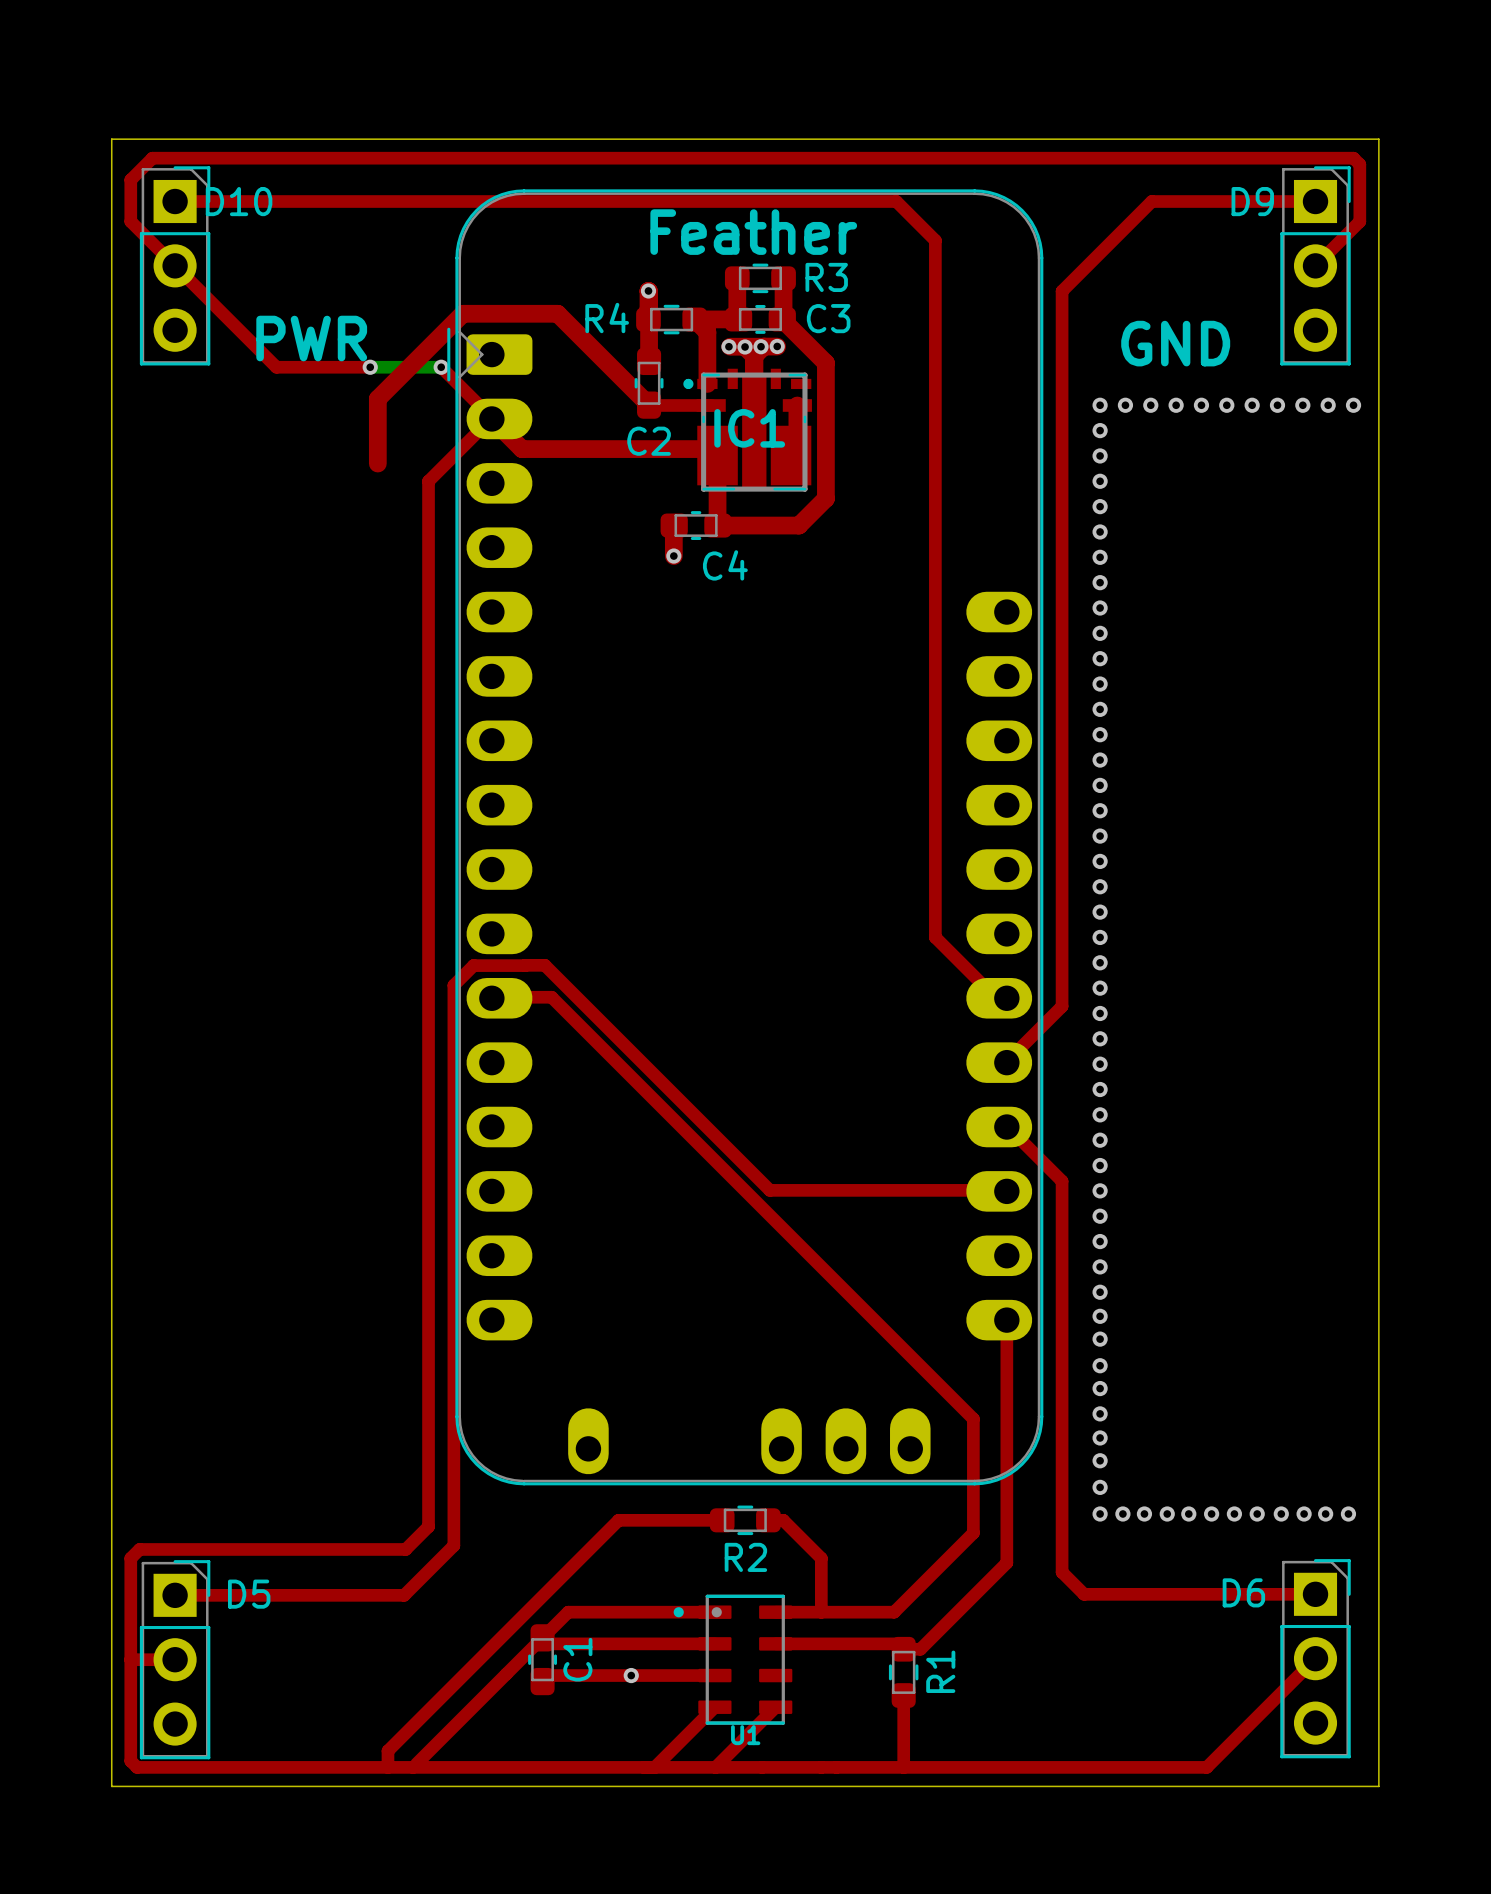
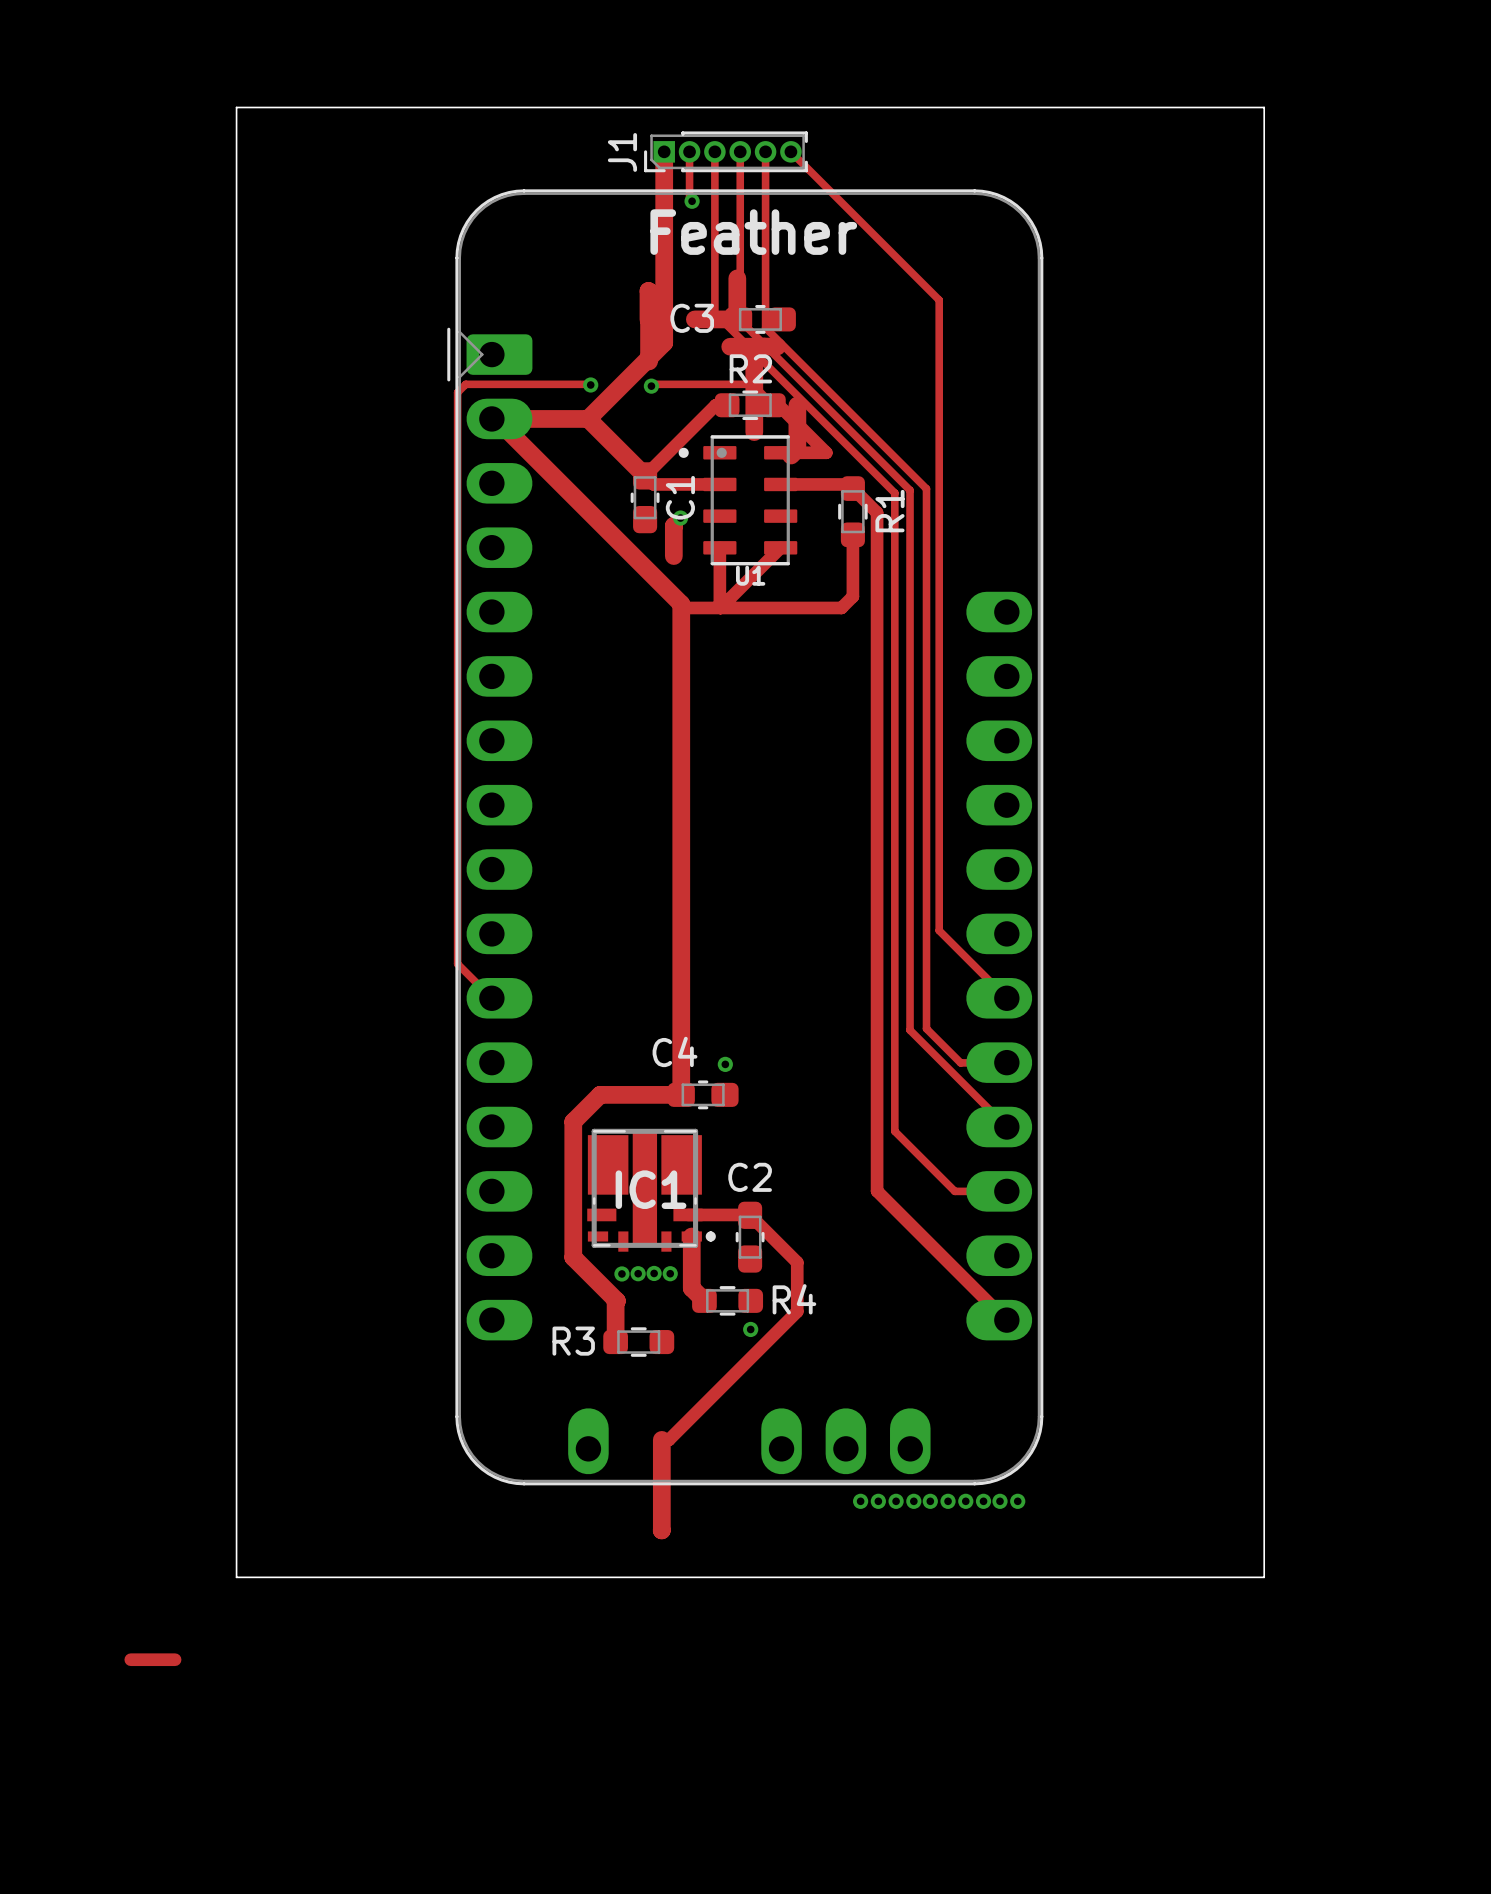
board edge: (111, 139) (1378, 139) (1378, 1786) (111, 1786) (111, 139) -> (236, 107) (236, 1577) (1264, 1577) (1264, 107) (236, 107)
top track: none -> (664, 151) (664, 342) (588, 418)
top track: none -> (689, 151) (689, 198) (692, 201)
top track: none -> (714, 151) (714, 313) (894, 493) (894, 1131) (954, 1191) (1006, 1191)
J1: none -> (725, 151)
top track: none -> (740, 151) (740, 320) (910, 490) (910, 1030) (1006, 1127)
top track: none -> (765, 151) (765, 327) (926, 488) (926, 1028) (960, 1062) (1006, 1062)
top track: none -> (790, 151) (939, 300) (939, 930) (1006, 998)
top track: (175, 201) (896, 201) (935, 240) (935, 937) (995, 997) -> none
via: none -> (692, 201)
top track: (1315, 201) (1151, 201) (1062, 291) (1062, 1006) (1006, 1061) -> none
D10: (175, 265) -> none
top track: (1315, 265) (1359, 221) (1359, 164) (1353, 158) (152, 158) (130, 179) (130, 221) (276, 367) (370, 367) -> none
D9: (1315, 265) -> none
R3 name position: R3 (826, 277) -> R3 (573, 1341)
R3 position: (760, 278) -> (638, 1342)
top track: (783, 278) (782, 319) (825, 363) (825, 498) (798, 525) (717, 525) (717, 455) (711, 449) (522, 449) (491, 418) -> (588, 418) (491, 418)
via: (648, 290) -> none
R4 name position: R4 (607, 318) -> R4 (794, 1299)
C3 name position: C3 (828, 318) -> C3 (692, 318)
R4 position: (671, 319) -> (727, 1300)
top track: (694, 323) (694, 319) (707, 332) (707, 383) -> none
text: PWR (311, 338) -> none
text: GND (1175, 343) -> none
via: (728, 346) -> none
via: (745, 346) -> none
via: (761, 346) -> none
via: (777, 346) -> none
bottom track: (370, 367) (441, 367) -> none
via: (370, 367) -> none
top track: (441, 367) (491, 417) (428, 481) (428, 1526) (405, 1549) (139, 1549) (130, 1558) (130, 1761) (137, 1767) (1206, 1767) (1315, 1658) -> none
via: (441, 367) -> none
C2 position: (649, 383) -> (750, 1237)
top track: none -> (590, 384) (465, 384) (457, 392) (457, 964) (491, 998)
via: none -> (590, 384)
top track: none -> (651, 386) (653, 384) (752, 384) (773, 405) (778, 405) (826, 452) (780, 452)
via: none -> (651, 386)
top track: (649, 405) (557, 313) (462, 313) (377, 398) (377, 463) -> none
top track: (649, 405) (711, 405) -> none
top track: none -> (727, 405) (715, 405) (645, 475)
via: (1100, 405) -> none
via: (1125, 405) -> none
via: (1150, 405) -> none
via: (1176, 405) -> none
via: (1201, 405) -> none
via: (1226, 405) -> none
via: (1252, 405) -> none
via: (1277, 405) -> none
via: (1302, 405) -> none
via: (1328, 405) -> none
via: (1353, 405) -> none
top track: none -> (496, 418) (681, 604)
top track: none -> (588, 418) (645, 475)
IC1 rotation: 0° (747, 430) -> 180° (651, 1190)
IC1 position: (747, 430) -> (651, 1190)
via: (1100, 430) -> none
C2 name position: C2 (649, 441) -> C2 (750, 1177)
via: (1100, 455) -> none
top track: none -> (645, 475) (653, 484) (719, 484)
via: (1100, 481) -> none
via: (1100, 506) -> none
C4 position: (696, 525) -> (703, 1094)
via: (1100, 531) -> none
top track: none -> (852, 534) (852, 596) (841, 607) (685, 607) (681, 604)
top track: none -> (719, 547) (720, 607) (780, 547)
via position: (673, 556) -> (680, 518)
via: (1100, 557) -> none
C4 name position: C4 (725, 565) -> C4 (675, 1051)
via: (1100, 582) -> none
top track: none -> (681, 604) (681, 1094) (600, 1094) (573, 1121) (573, 1257) (616, 1301) (615, 1342)
via: (1100, 608) -> none
via: (1100, 633) -> none
via: (1100, 658) -> none
via: (1100, 684) -> none
via: (1100, 709) -> none
via: (1100, 734) -> none
via: (1100, 760) -> none
via: (1100, 785) -> none
via: (1100, 810) -> none
via: (1100, 836) -> none
via: (1100, 861) -> none
via: (1100, 886) -> none
via: (1100, 912) -> none
via: (1100, 937) -> none
via: (1100, 962) -> none
top track: (525, 965) (544, 965) (769, 1190) (1005, 1190) -> none
top track: (525, 965) (473, 965) (453, 985) (453, 1545) (404, 1595) (175, 1595) -> none
via: (1100, 988) -> none
top track: (491, 997) (551, 997) (973, 1418) (973, 1533) (894, 1612) (775, 1612) -> none
via: (1100, 1013) -> none
via: (1100, 1038) -> none
via: none -> (725, 1064)
via: (1100, 1064) -> none
via: (1100, 1089) -> none
via: (1100, 1114) -> none
top track: (1006, 1126) (1062, 1181) (1062, 1572) (1084, 1594) (1315, 1594) -> none
via: (1100, 1140) -> none
via: (1100, 1165) -> none
via: (1100, 1190) -> none
top track: none -> (687, 1214) (749, 1214) (797, 1262) (797, 1311) (668, 1439) (661, 1439) (661, 1530)
via: (1100, 1216) -> none
top track: none -> (691, 1236) (691, 1288) (704, 1300) (704, 1297)
via: (1100, 1241) -> none
via: (1100, 1266) -> none
via: none -> (621, 1273)
via: none -> (638, 1273)
via: none -> (654, 1273)
via: none -> (670, 1273)
via: (1100, 1292) -> none
via: (1100, 1316) -> none
top track: (1006, 1319) (1006, 1562) (920, 1649) (903, 1649) (898, 1643) (775, 1643) -> (1006, 1320) (877, 1191) (877, 512) (848, 484) (780, 484)
via: none -> (750, 1329)
via: (1100, 1339) -> none
via: (1100, 1365) -> none
via: (1100, 1388) -> none
via: (1100, 1413) -> none
via: (1100, 1437) -> none
via: (1100, 1460) -> none
via: (1100, 1487) -> none
via: none -> (860, 1501)
via: none -> (878, 1501)
via: none -> (896, 1501)
via: none -> (913, 1501)
via: none -> (930, 1501)
via: none -> (948, 1501)
via: none -> (965, 1501)
via: none -> (983, 1501)
via: none -> (999, 1501)
via: none -> (1017, 1501)
via: (1100, 1513) -> none
via: (1122, 1513) -> none
via: (1144, 1513) -> none
via: (1167, 1513) -> none
via: (1188, 1513) -> none
via: (1211, 1513) -> none
via: (1234, 1513) -> none
via: (1257, 1513) -> none
via: (1281, 1513) -> none
via: (1304, 1513) -> none
via: (1325, 1513) -> none
via: (1348, 1513) -> none
top track: (722, 1520) (618, 1520) (387, 1750) (387, 1767) -> none
R2 position: (745, 1520) -> (750, 405)
top track: (768, 1520) (783, 1520) (821, 1558) (821, 1612) -> none
R2 name position: R2 (745, 1557) -> R2 (750, 368)
top track: (714, 1612) (568, 1612) (416, 1764) -> none
top track: (542, 1637) (548, 1643) (714, 1643) -> none
D6: (1315, 1658) -> none
D5: (175, 1659) -> none
C1 position: (542, 1659) -> (645, 497)
U1 position: (732, 1659) -> (737, 500)
R1 position: (903, 1672) -> (852, 511)
via: (631, 1675) -> none
top track: (714, 1675) (548, 1675) (542, 1681) -> none
top track: (903, 1695) (903, 1767) -> none
top track: (714, 1707) (654, 1767) -> none
top track: (775, 1707) (715, 1767) -> none

